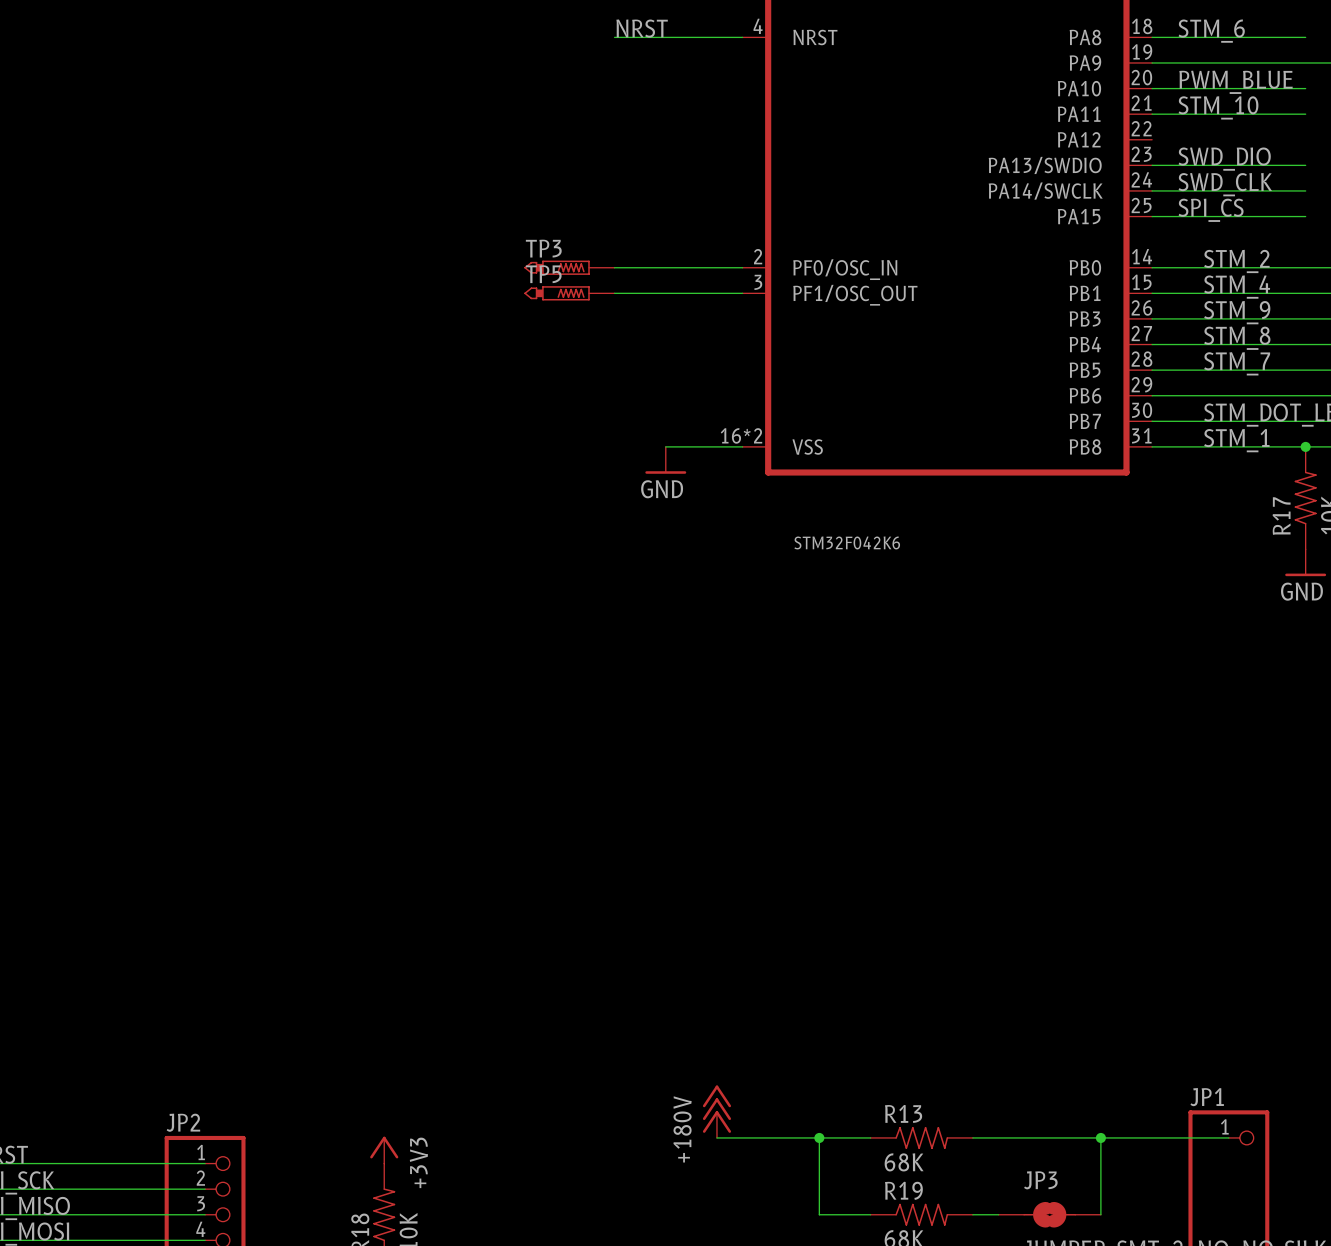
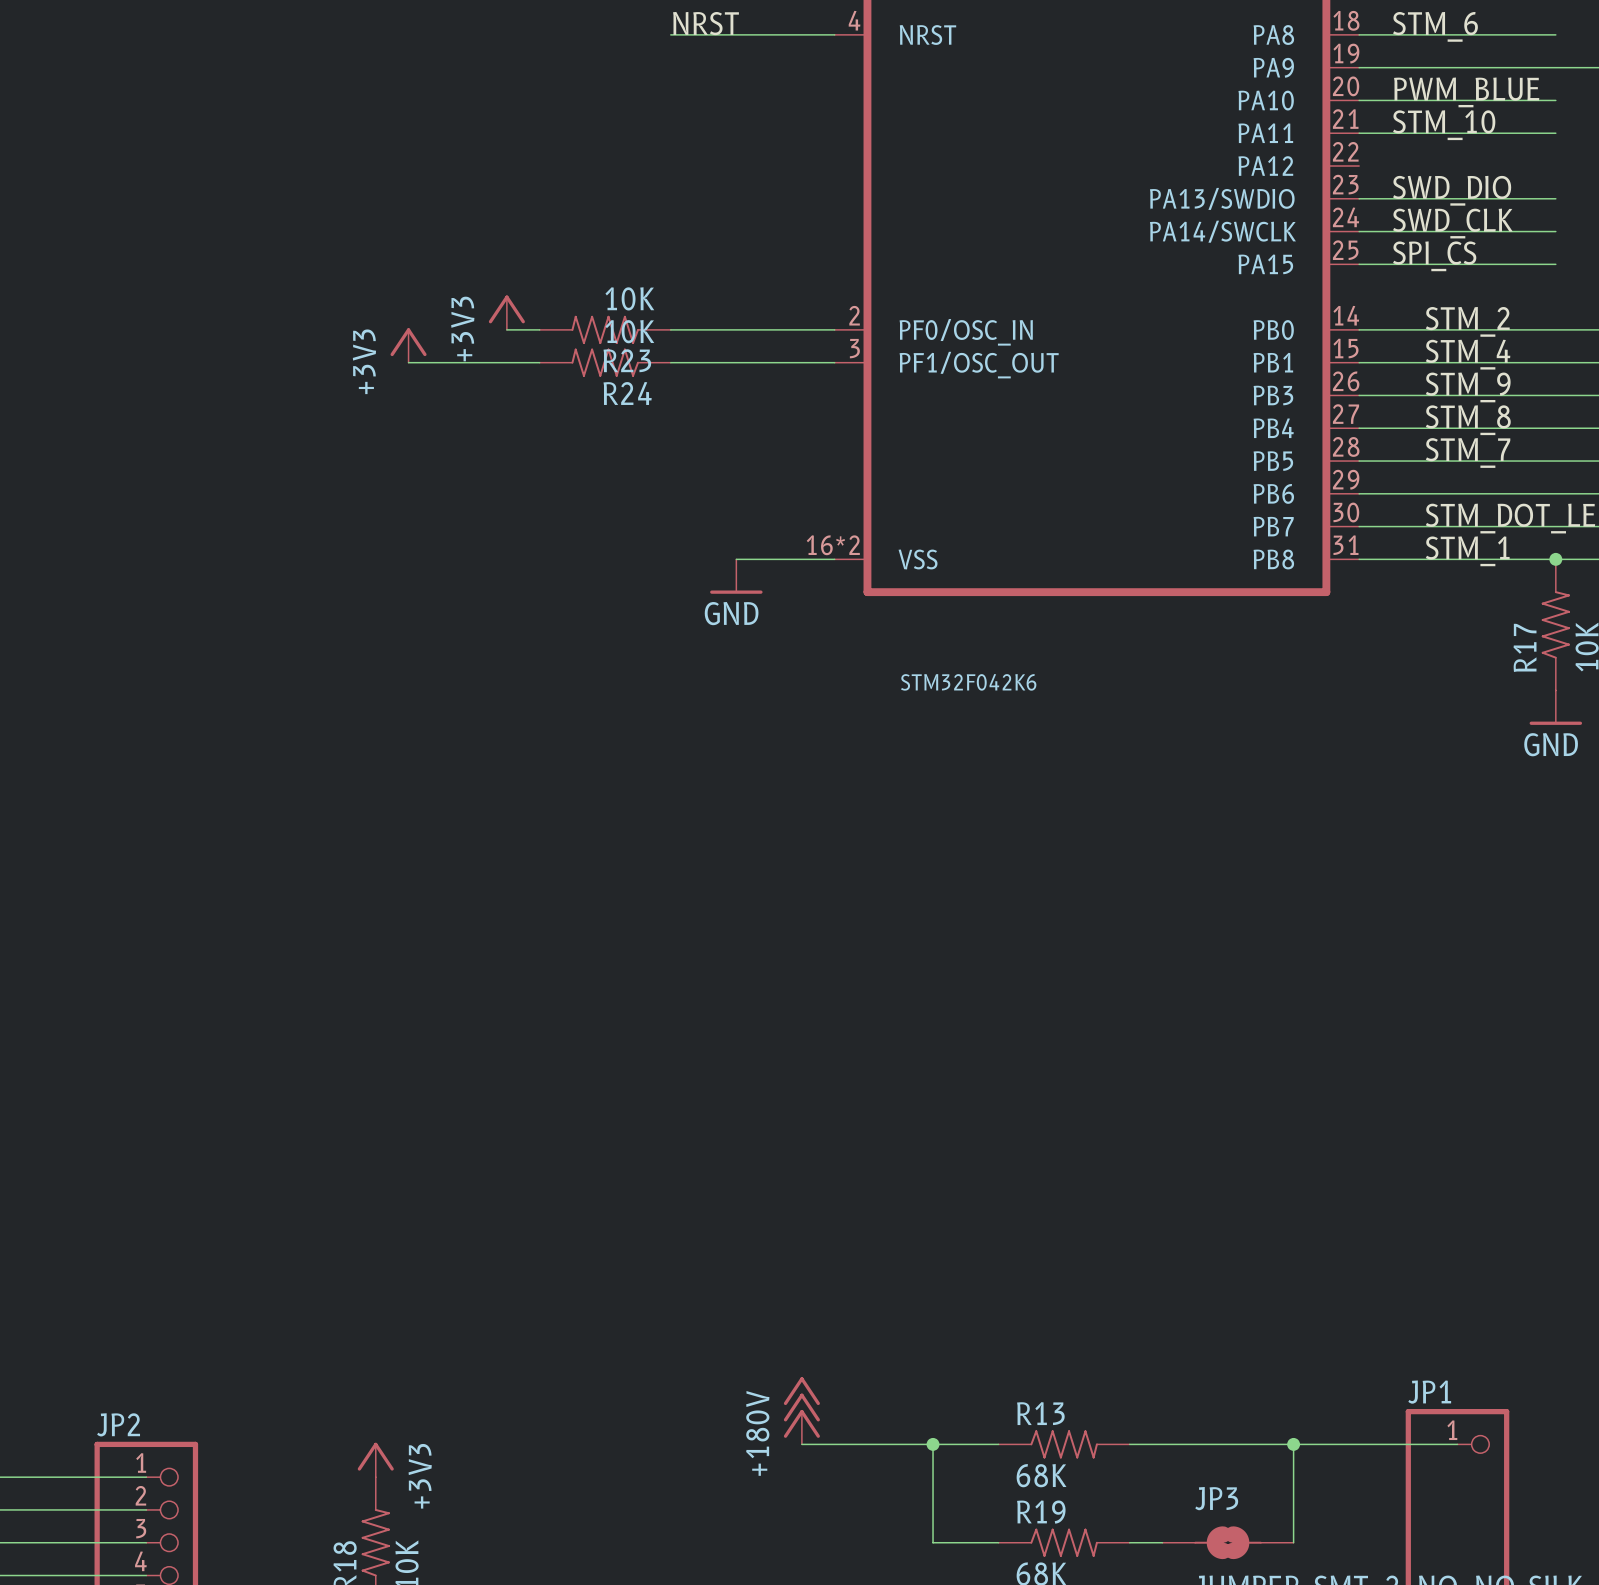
power symbol: none -> +3V3 (506, 312)
wire: none -> (506, 329) (539, 329)
R23: none -> 10K (605, 329)
TP3: (569, 267) -> none
power symbol: none -> +3V3 (408, 345)
wire: none -> (408, 362) (539, 362)
R24: none -> 10K (605, 362)
TP5: (569, 293) -> none

